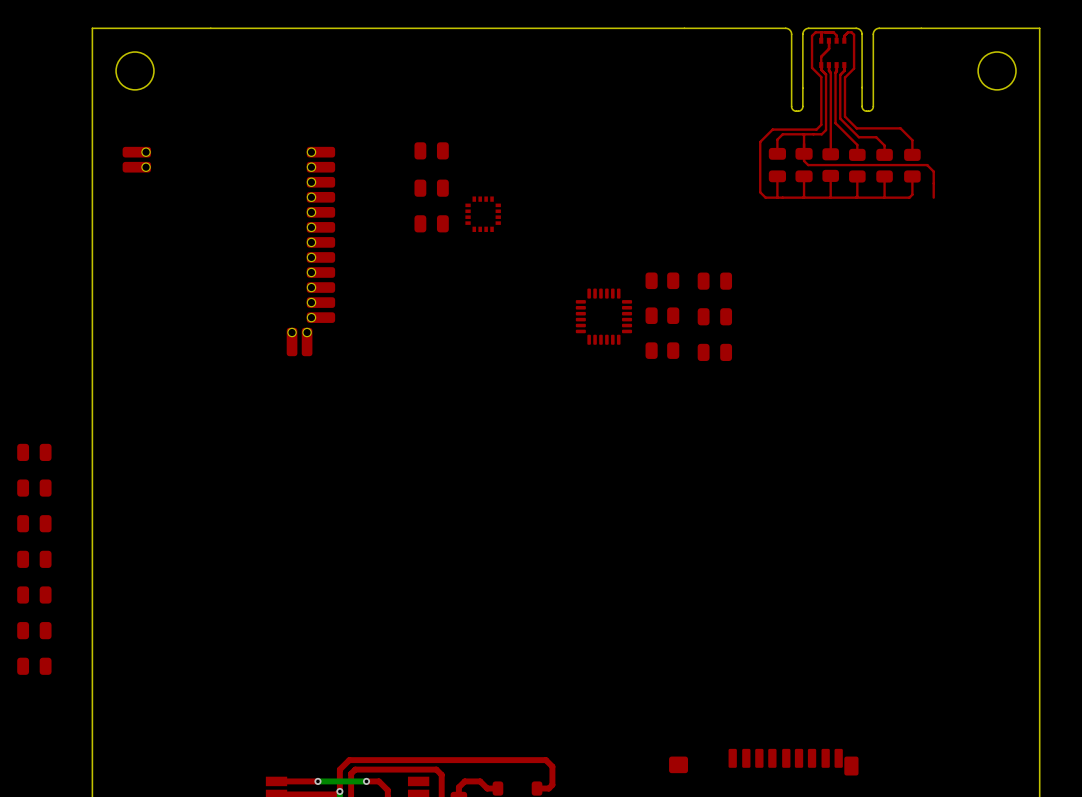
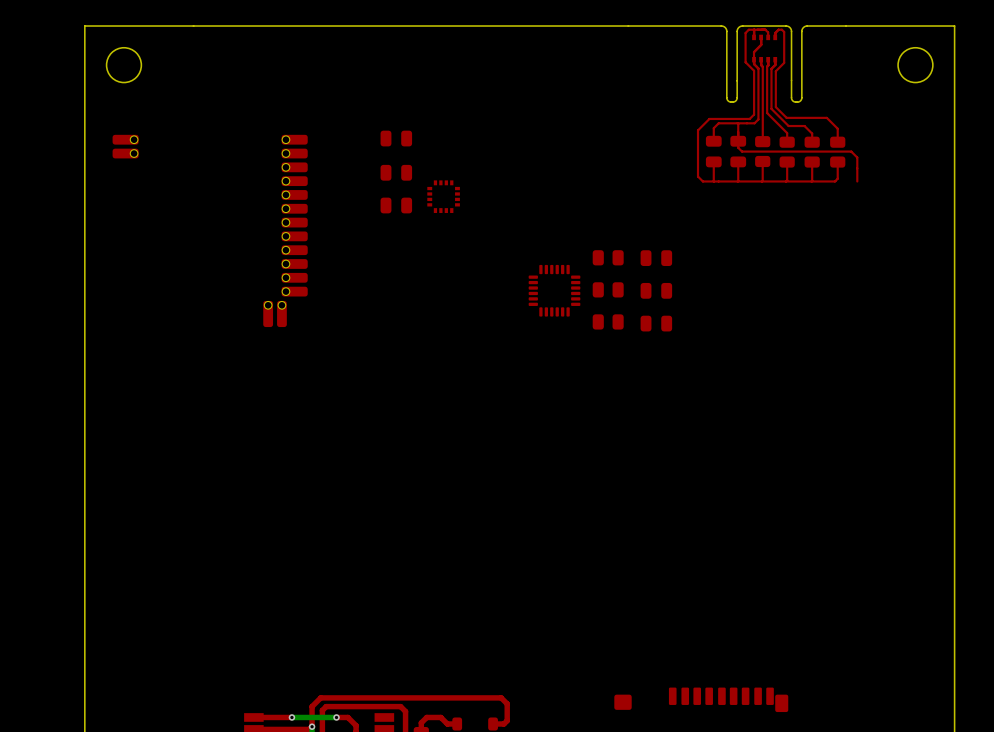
part: (34, 452) -> none
part: (34, 488) -> none
part: (34, 523) -> none
part: (34, 559) -> none
part: (34, 594) -> none
part: (34, 630) -> none
part: (34, 666) -> none

